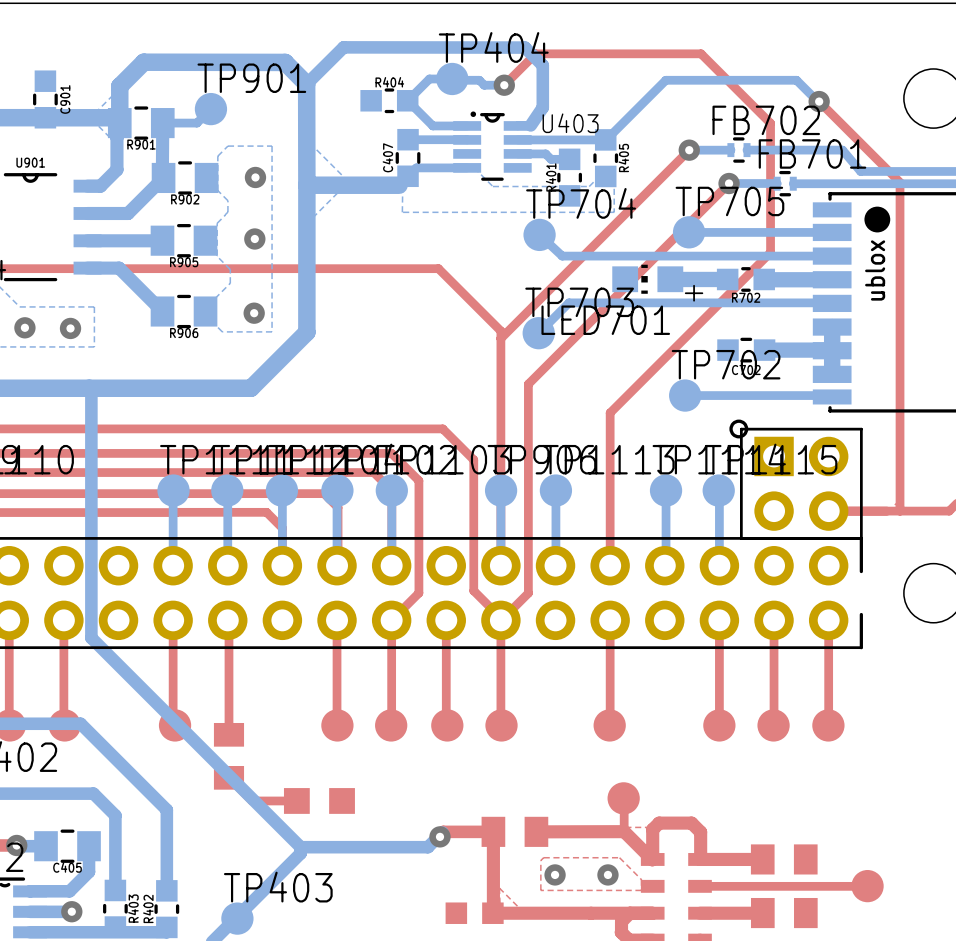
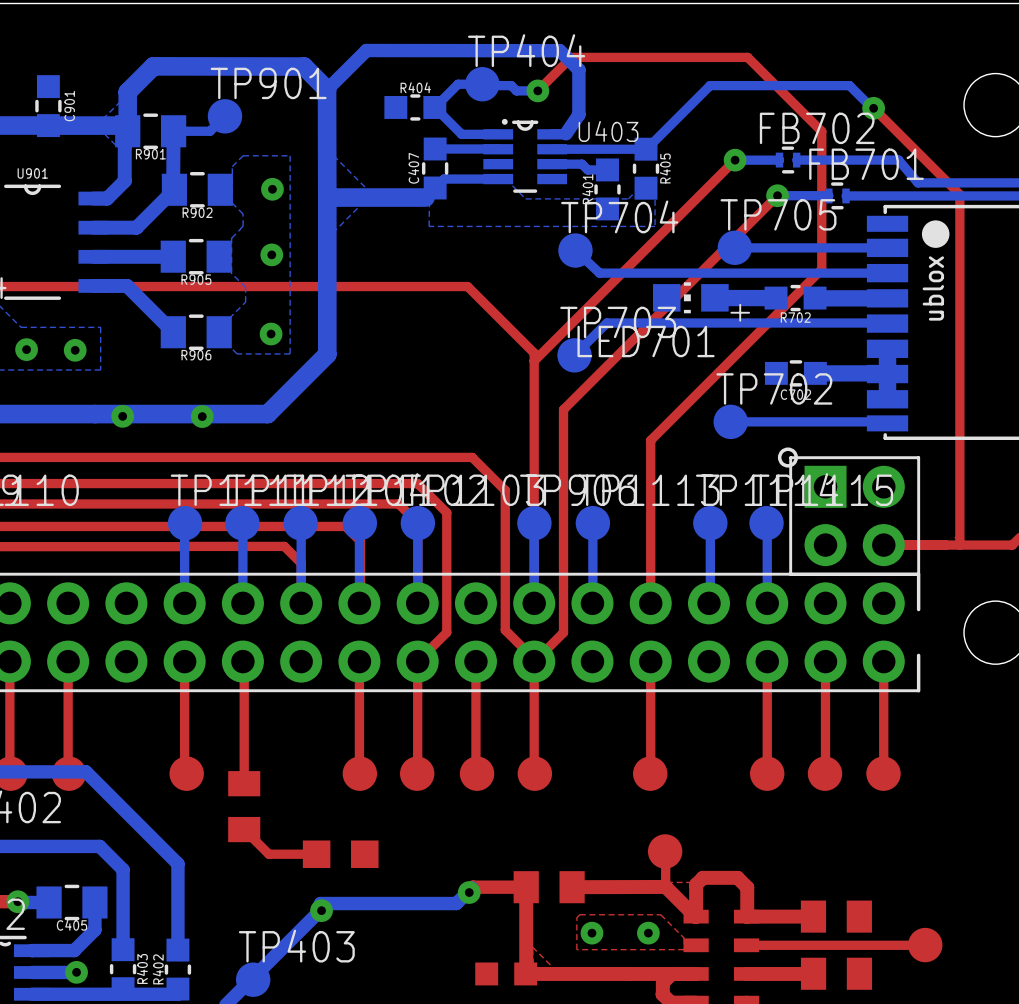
bottom track: (91, 390) (91, 637) (300, 847) -> none
via: none -> (122, 416)
via: none -> (202, 416)
via: none -> (321, 910)

